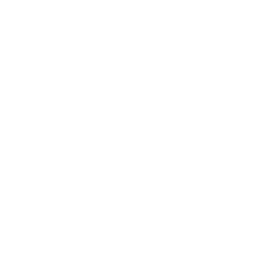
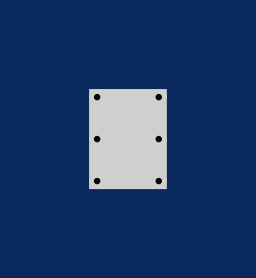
part: none -> (127, 139)

